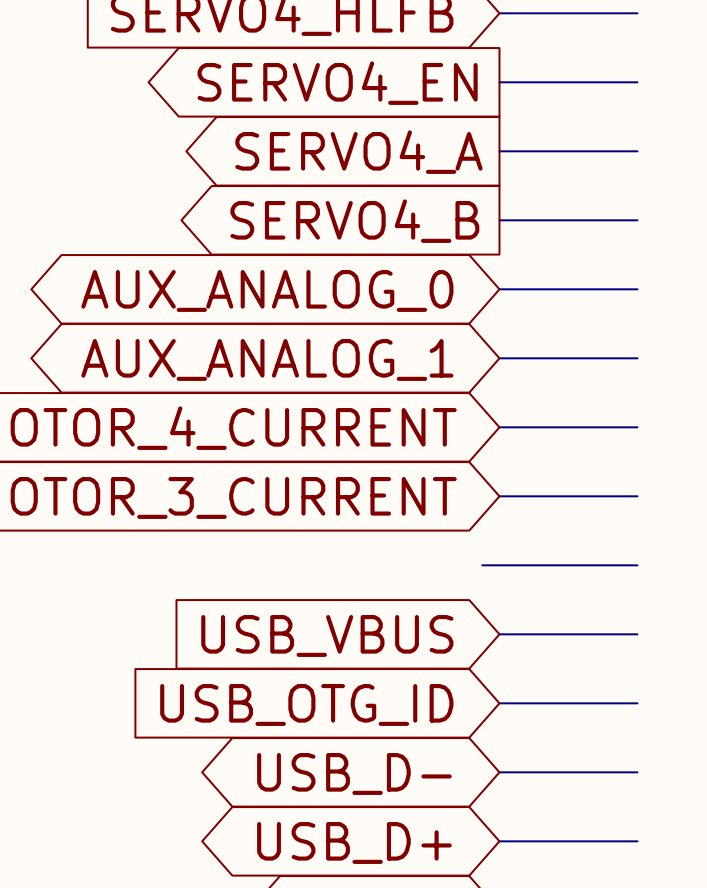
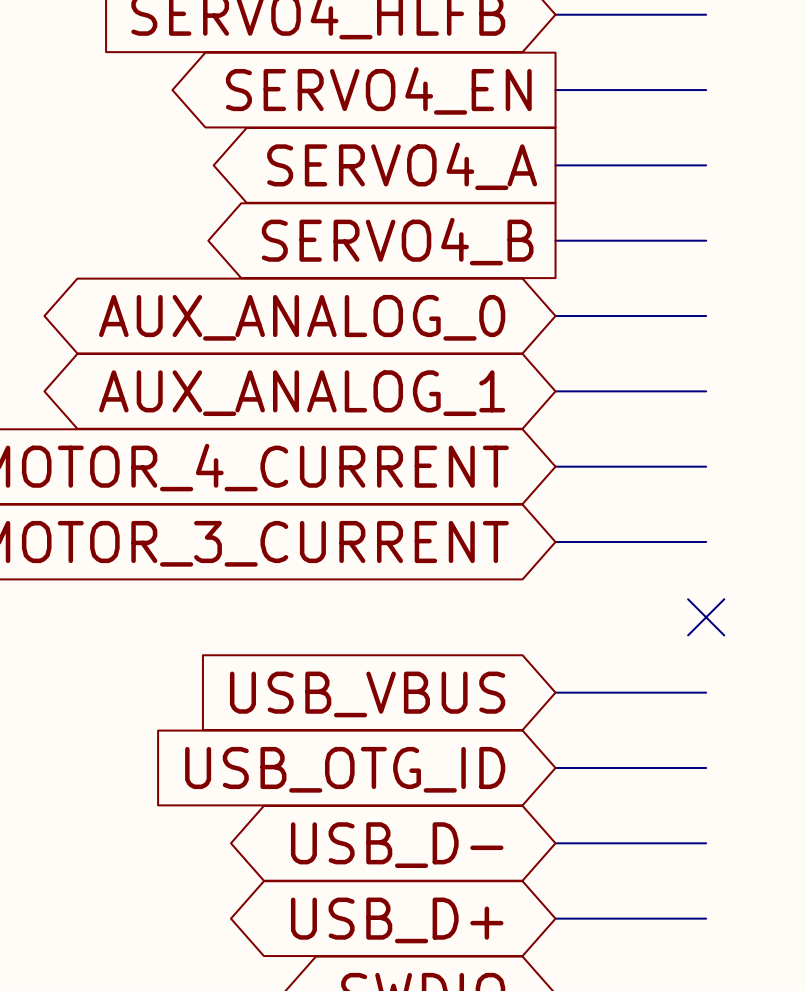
wire: (482, 565) (637, 565) -> none
no-connect mark: none -> (706, 617)

